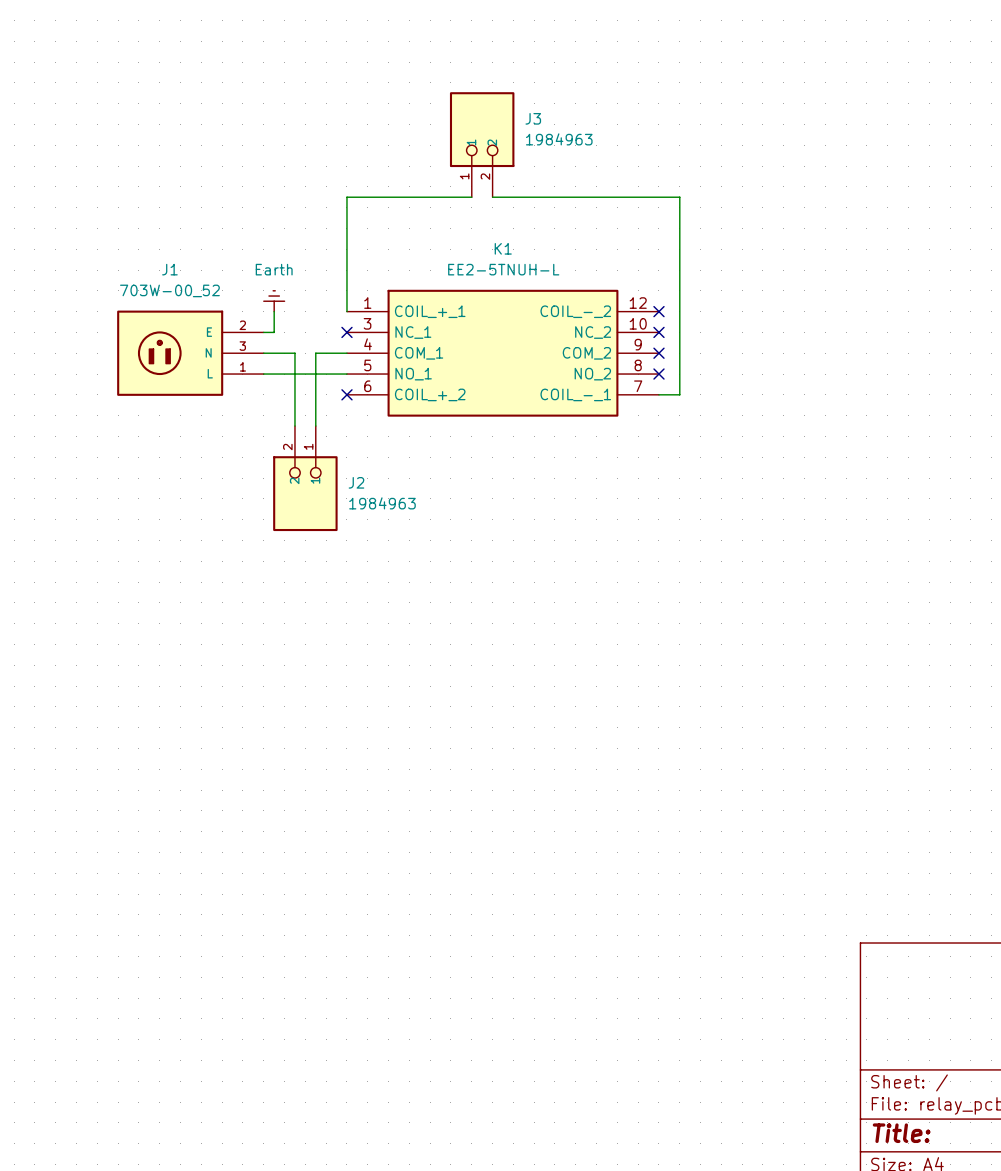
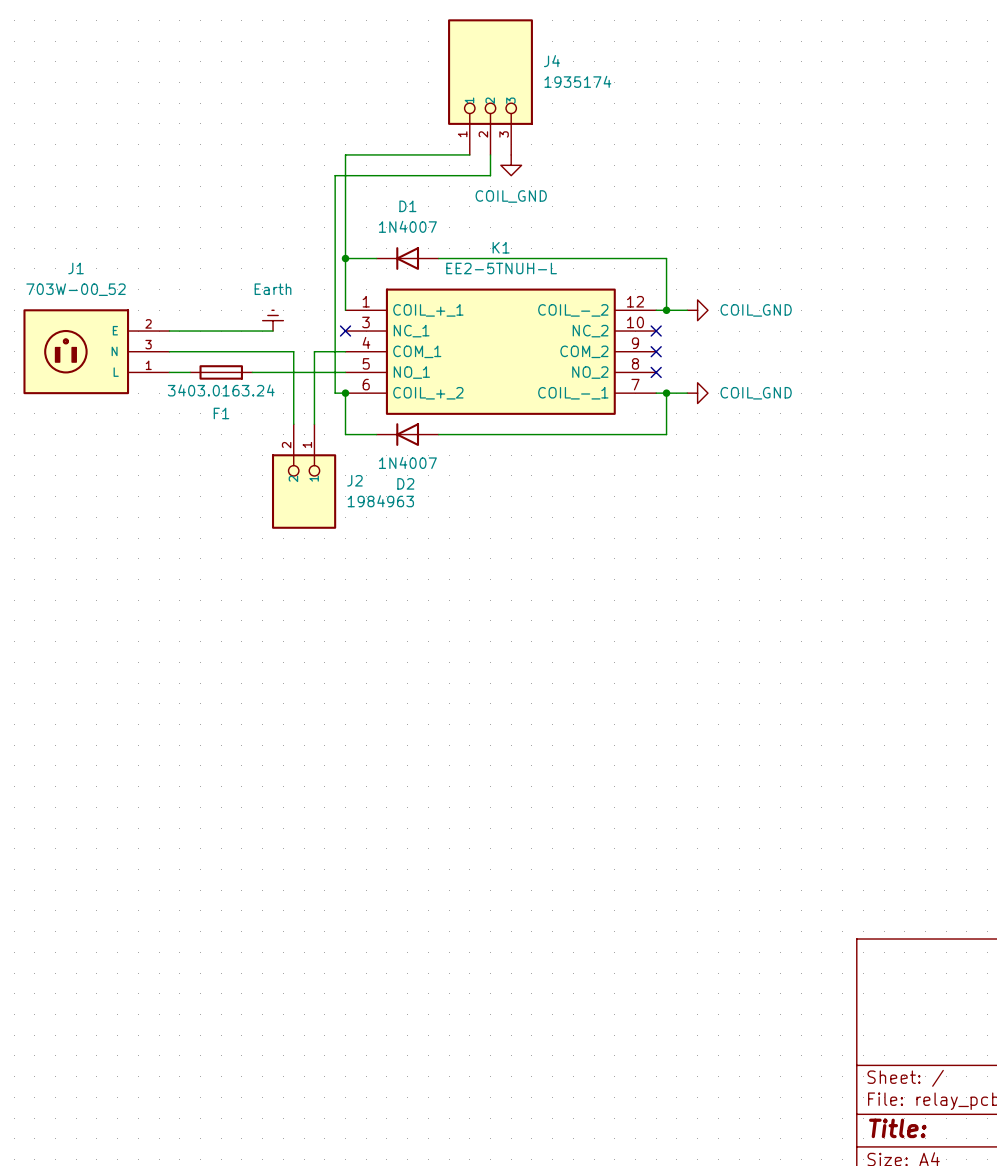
J4: none -> 1935174 (490, 87)
J3: 1984963 (482, 144) -> none
wire: none -> (490, 154) (490, 175) (335, 175) (335, 393) (345, 393) (345, 434) (376, 434)
power symbol: none -> COIL_GND (511, 165)
wire: (346, 197) (471, 197) -> (345, 196) (345, 154) (469, 154)
wire: (492, 197) (679, 197) (679, 394) -> (687, 393) (676, 393)
wire: none -> (345, 258) (376, 258)
junction: none -> (345, 258)
D1: none -> 1N4007 (407, 258)
wire: none -> (438, 258) (666, 258) (666, 310)
power symbol position: Earth (274, 301) -> Earth (273, 320)
wire: none -> (656, 310) (687, 310)
no-connect mark: (658, 311) -> none
junction: none -> (666, 310)
power symbol: none -> COIL_GND (697, 310)
J1 position: (190, 353) -> (96, 351)
F1: none -> 3403.0163.24 (221, 372)
no-connect mark: (346, 394) -> none
junction: none -> (345, 393)
wire: none -> (666, 393) (666, 434) (438, 434)
junction: none -> (666, 393)
power symbol: none -> COIL_GND (697, 393)
D2: none -> 1N4007 (407, 434)

